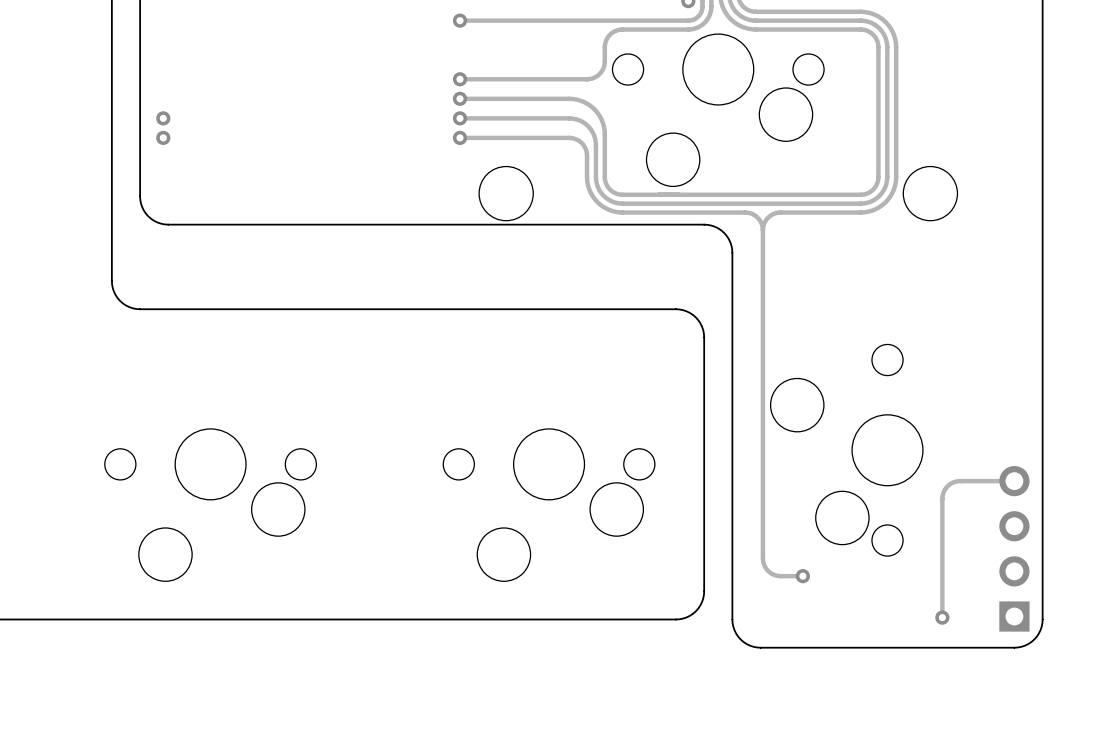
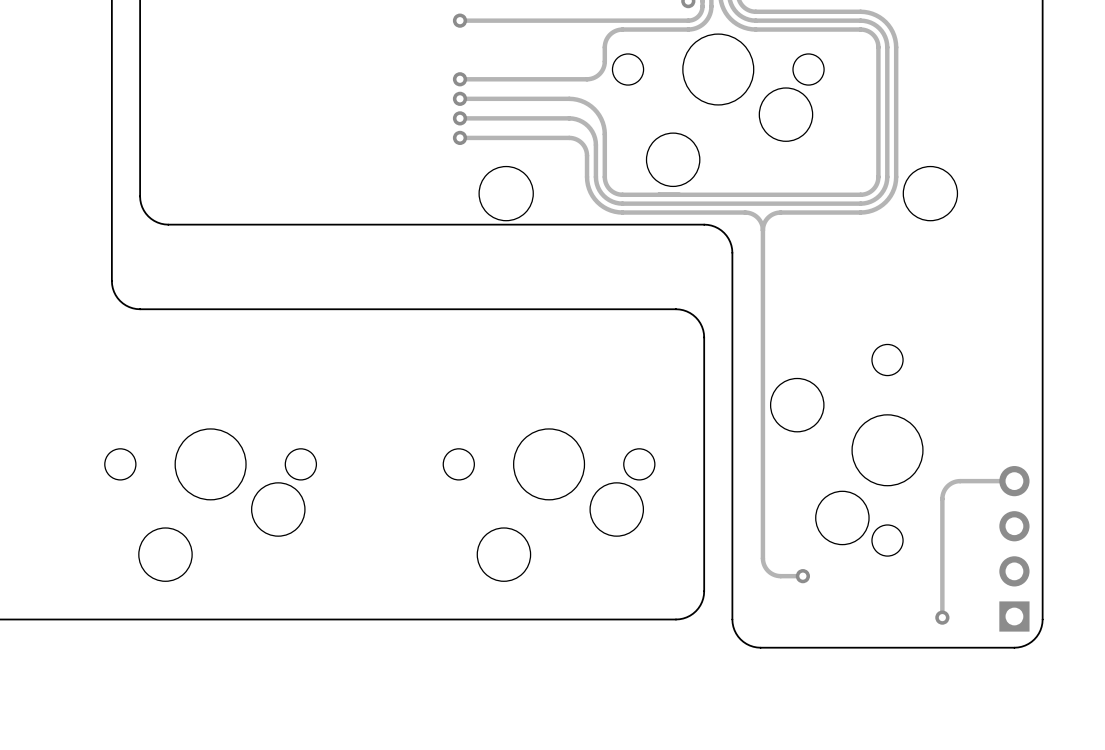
via: (163, 118) -> none
via: (163, 137) -> none

